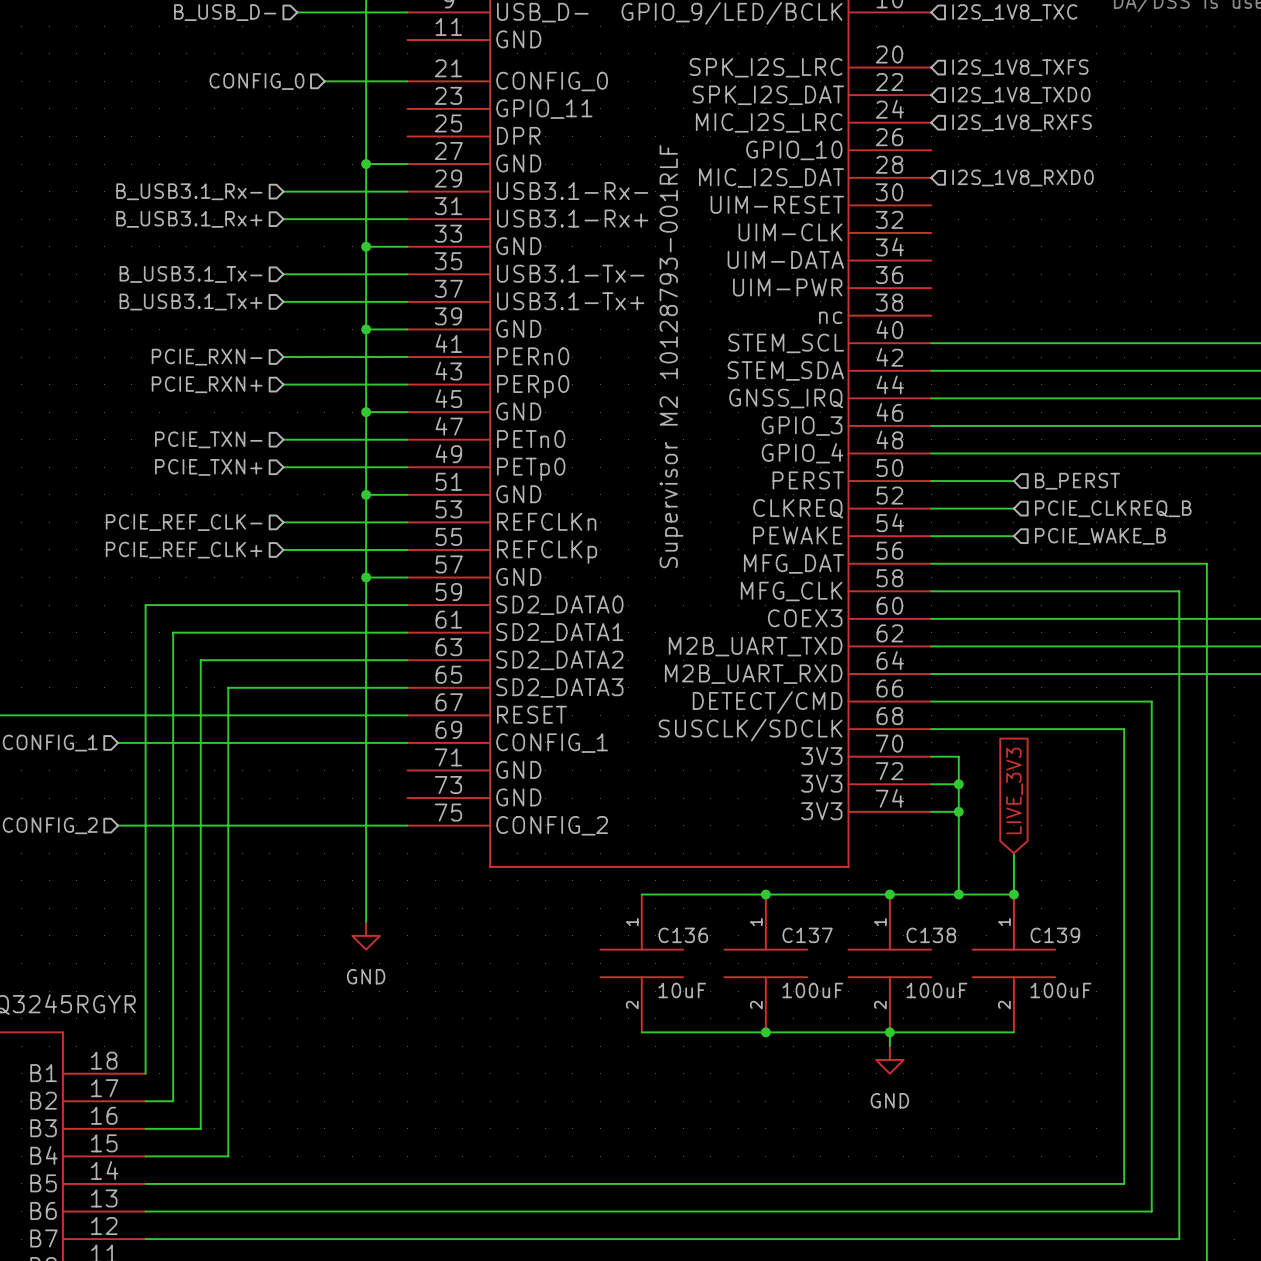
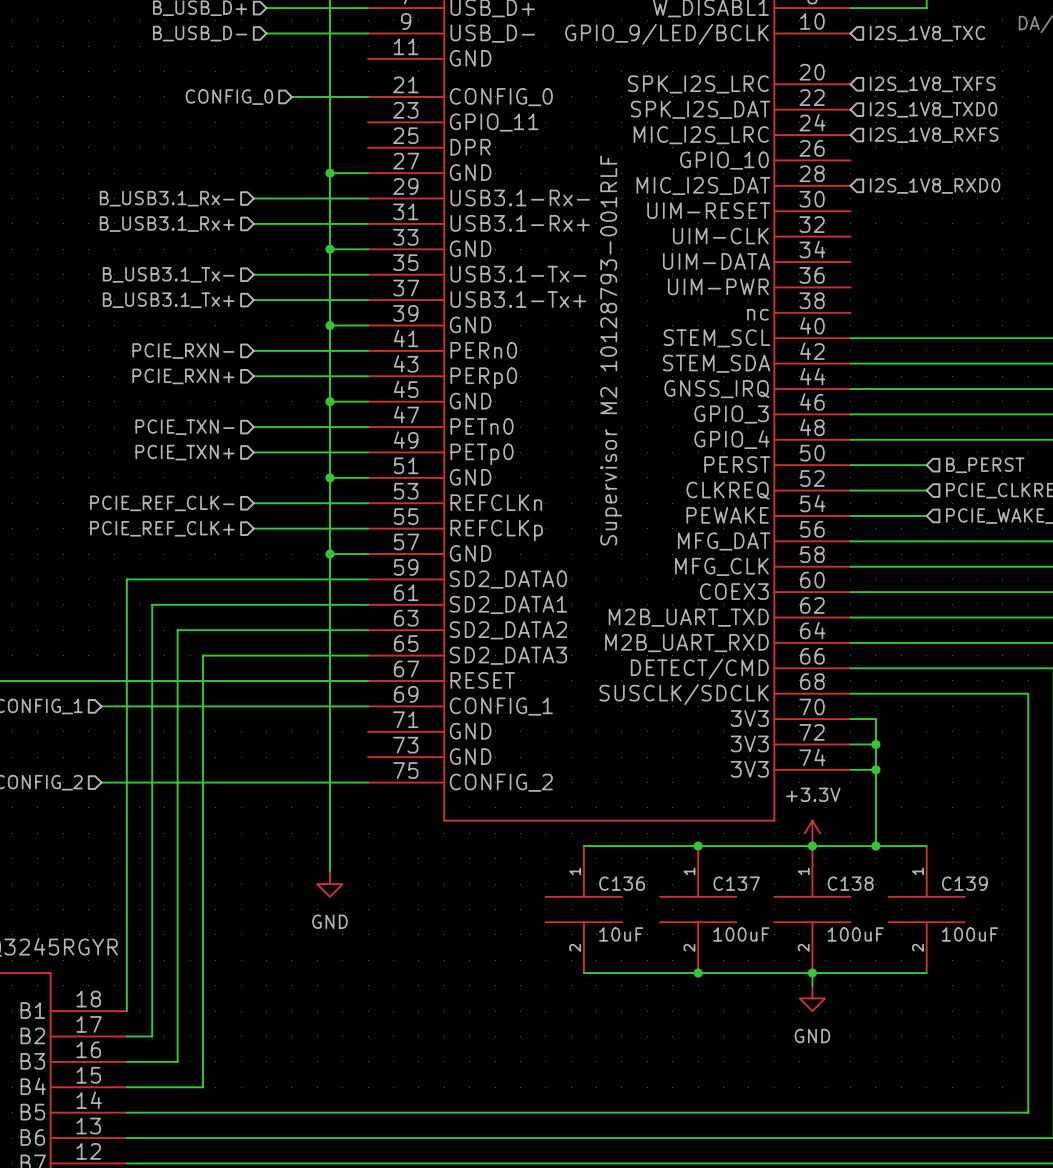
global label: LIVE_3V3 (1014, 790) -> none
wire: (1013, 853) (1013, 894) -> none
power symbol: none -> +3.3V (812, 833)
junction: (1013, 894) -> none

